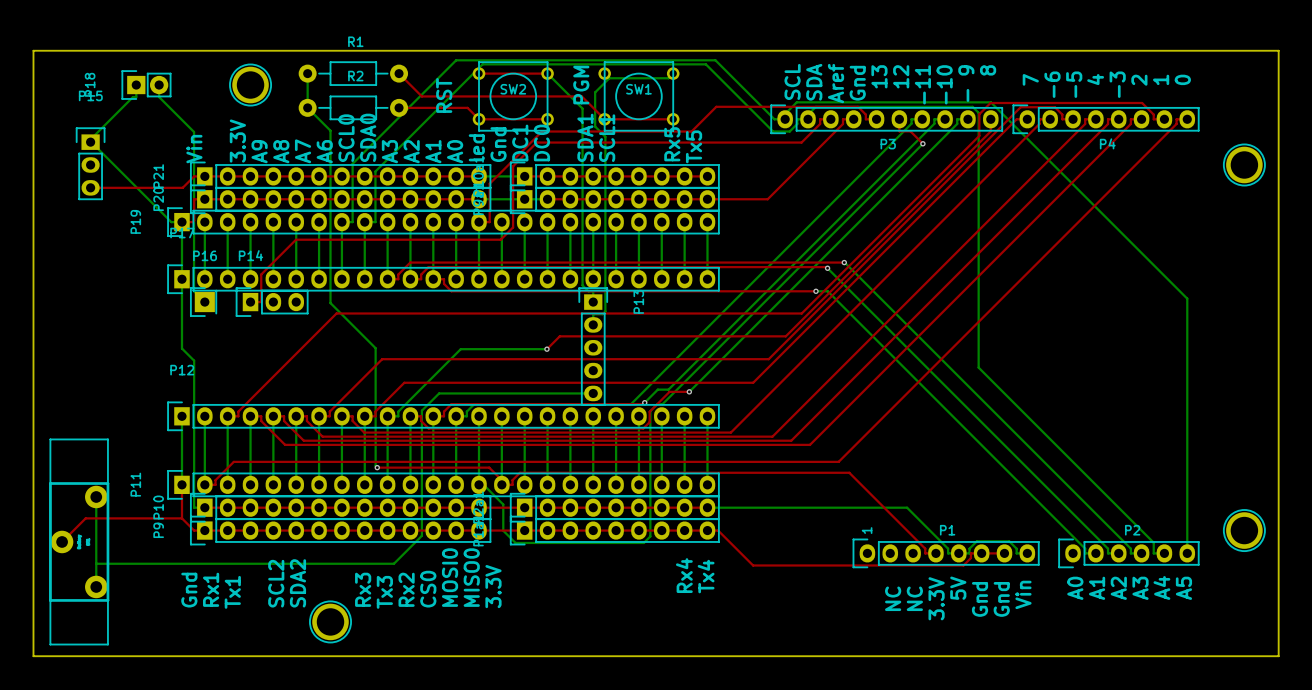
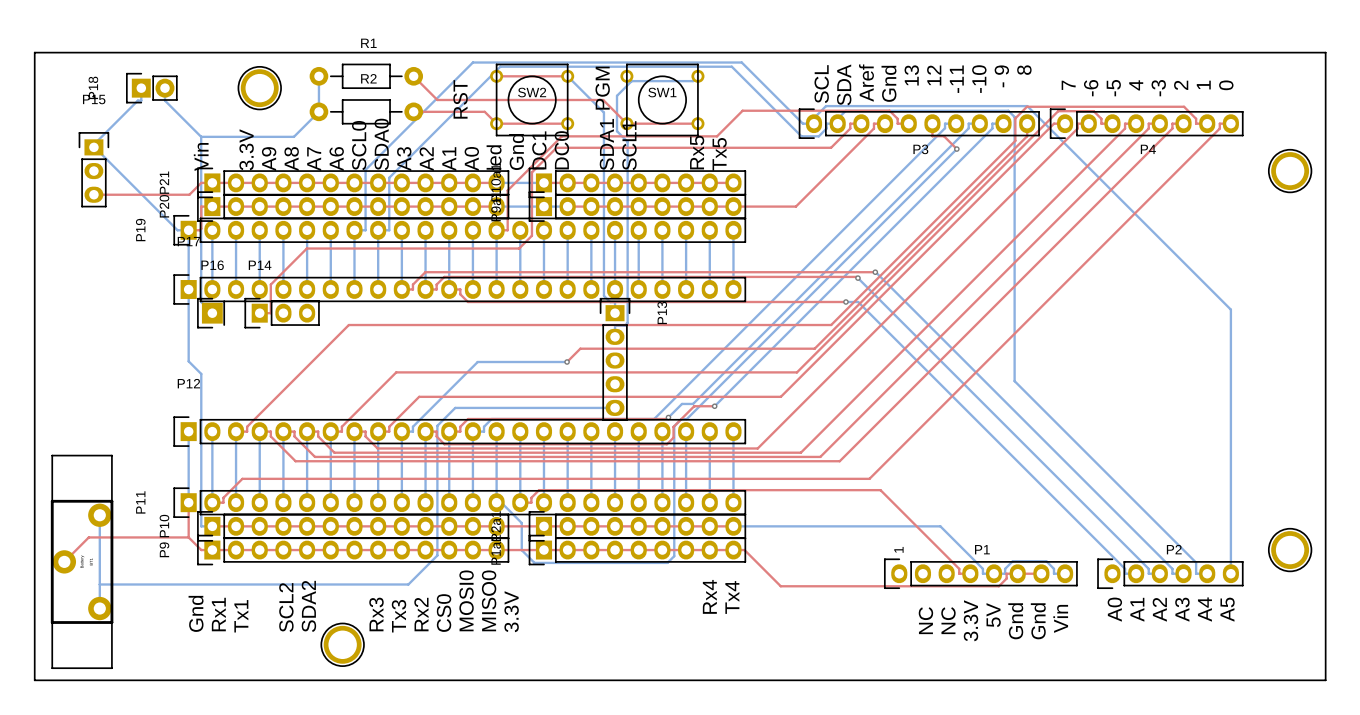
bottom track: (307, 107) (330, 130) (330, 303) (375, 348) (375, 466) (377, 467) -> (318, 111) (293, 136) (201, 136)
top track: (377, 467) (489, 467) (506, 484) -> none
via: (377, 467) -> none

